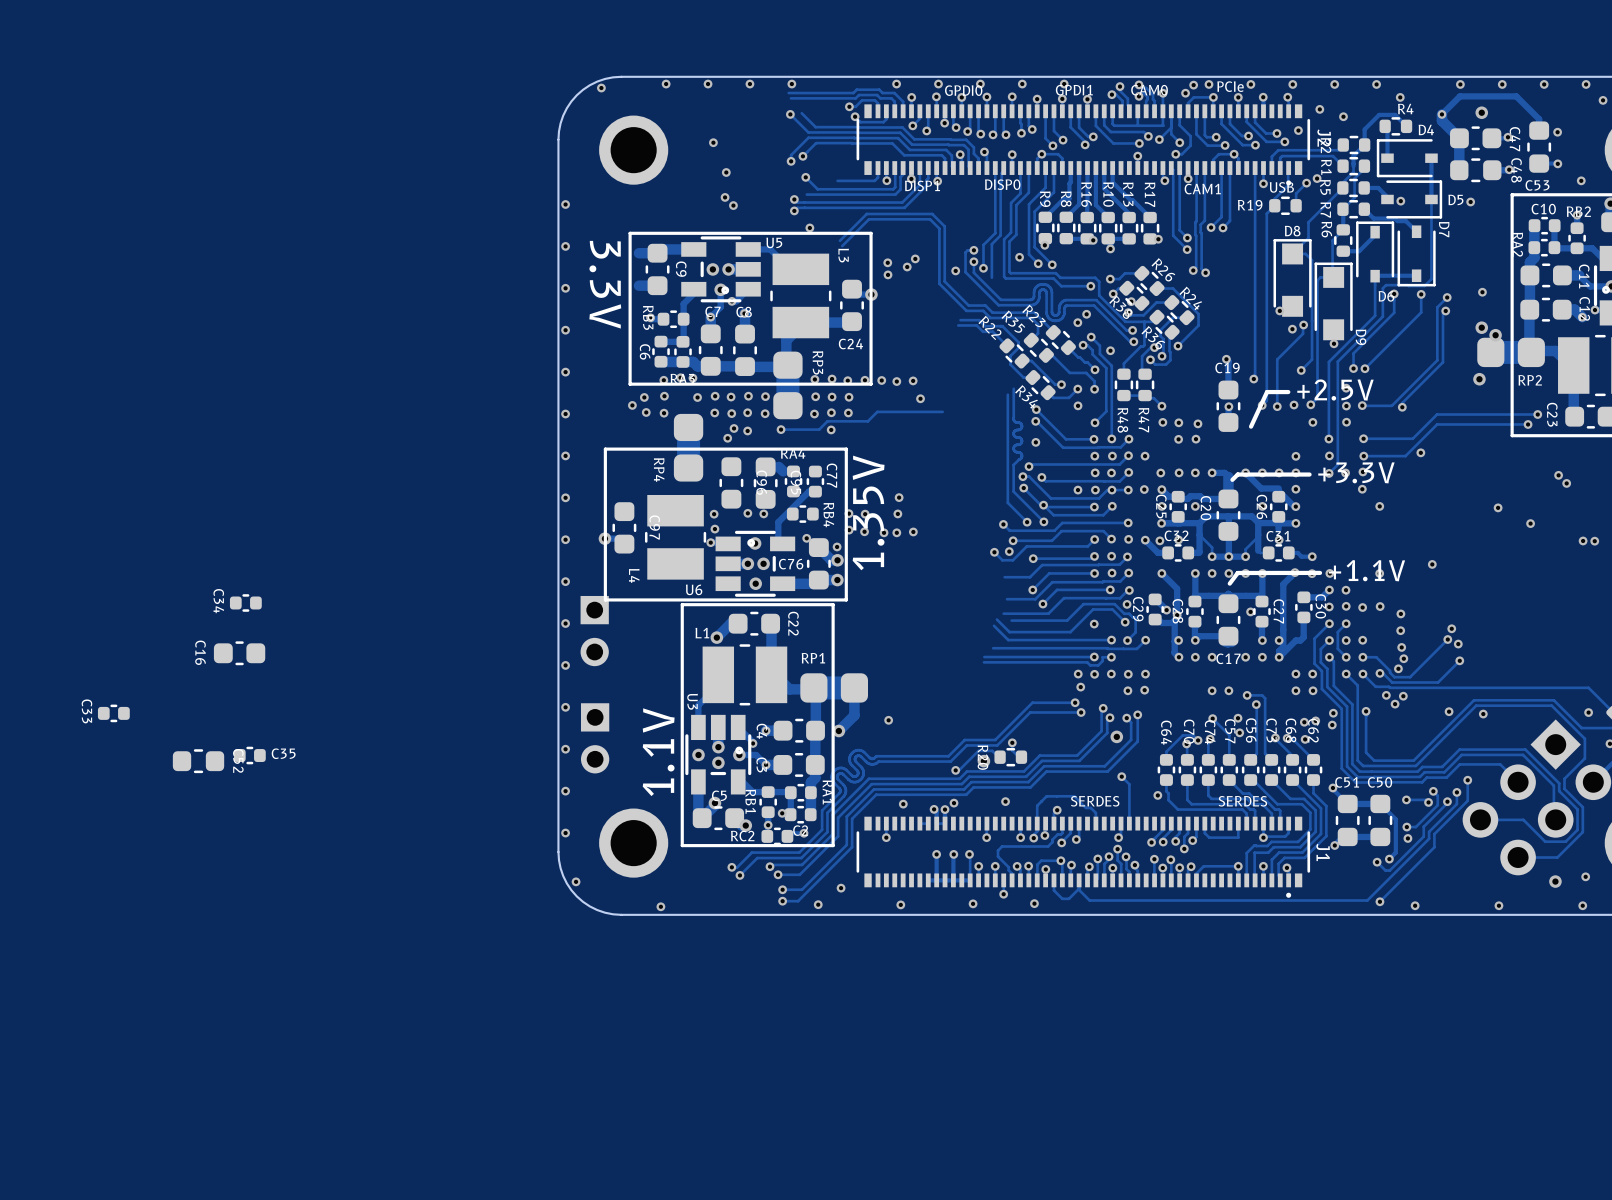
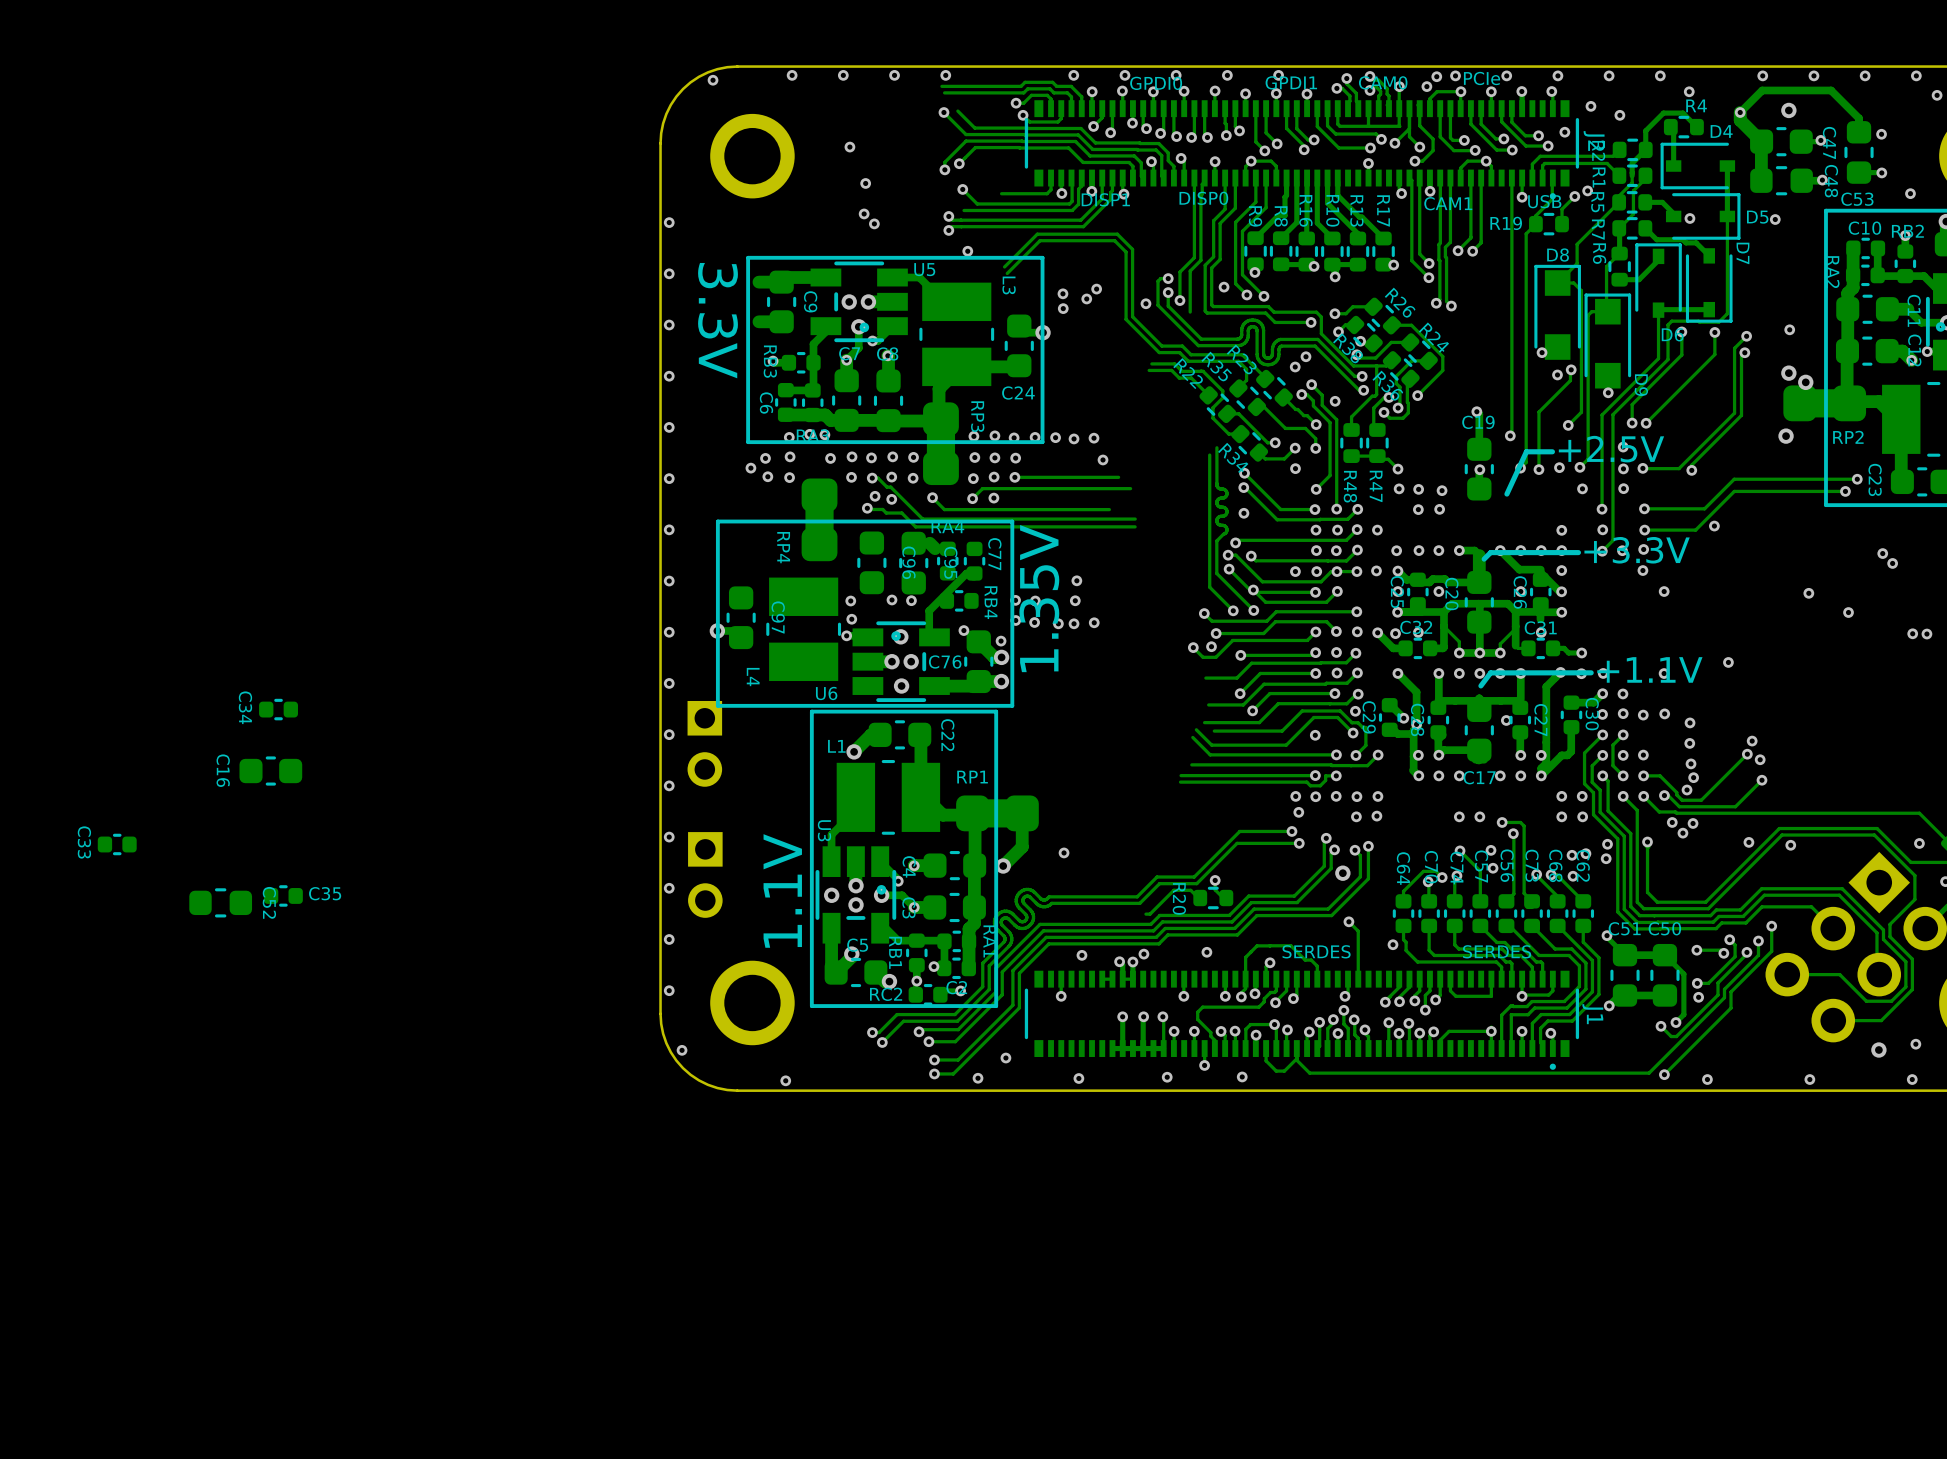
track: (942, 411) (877, 411) (867, 421) (827, 421) (819, 429) (781, 429) -> (1109, 509) (944, 509) (932, 497)
track: none -> (1118, 477) (1015, 478)
track: none -> (872, 478) (877, 478) (887, 487) (890, 487) (922, 519) (1135, 519)
track: none -> (1130, 488) (982, 488) (972, 498)
via: none -> (972, 498)
track: none -> (870, 509) (882, 509) (886, 513) (901, 513) (915, 526) (1135, 526)
via: (983, 761) -> none
via: (955, 770) -> none

